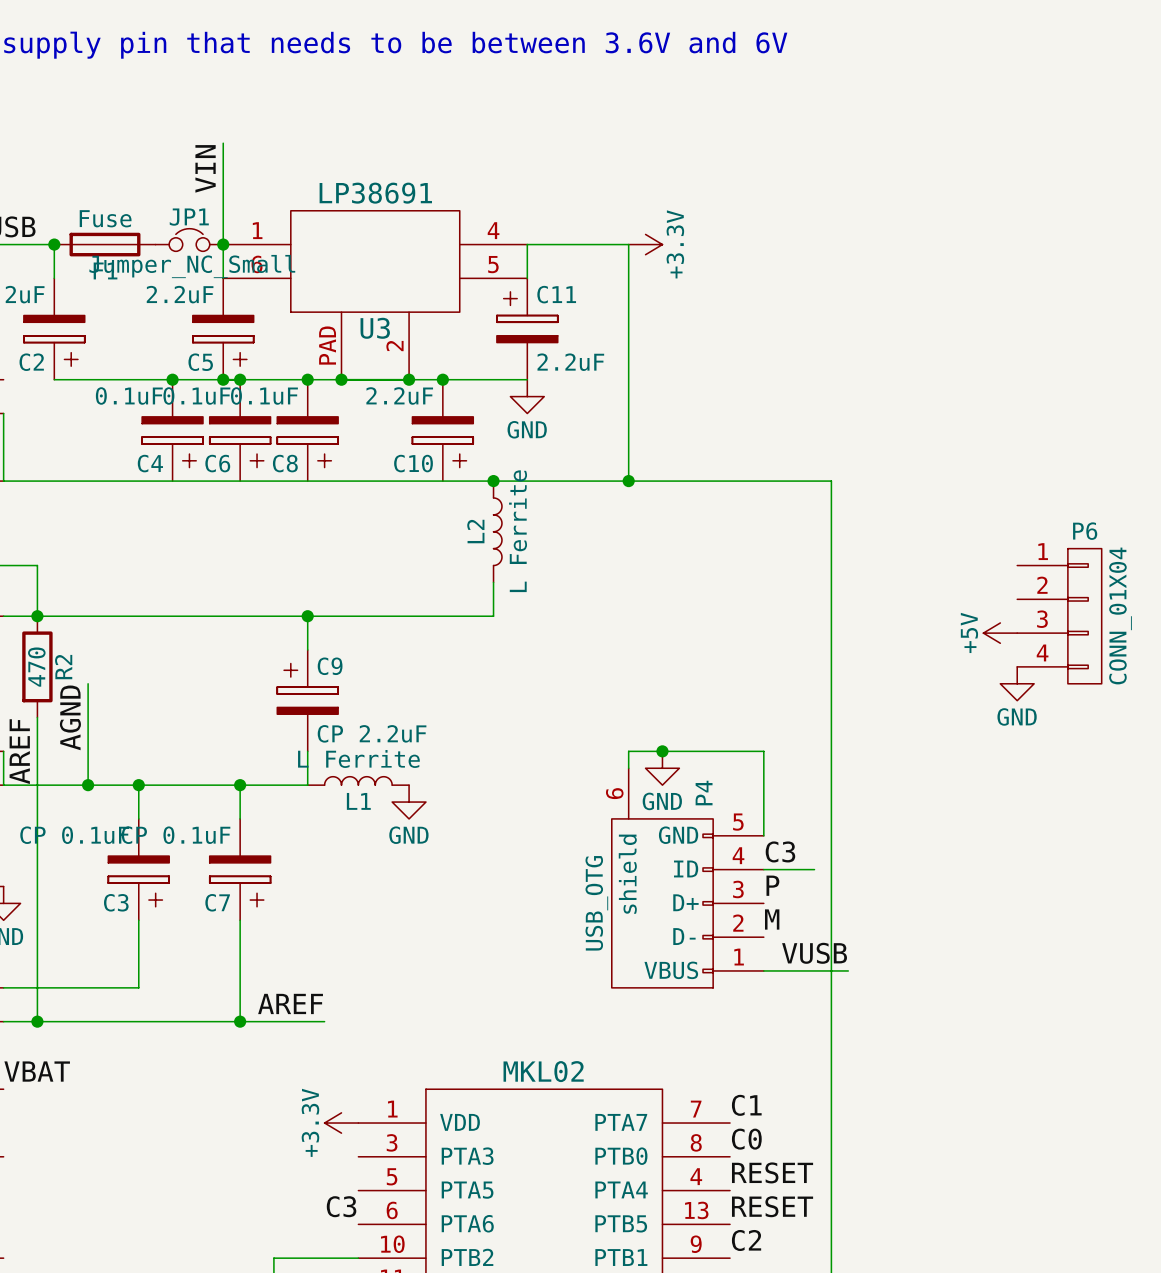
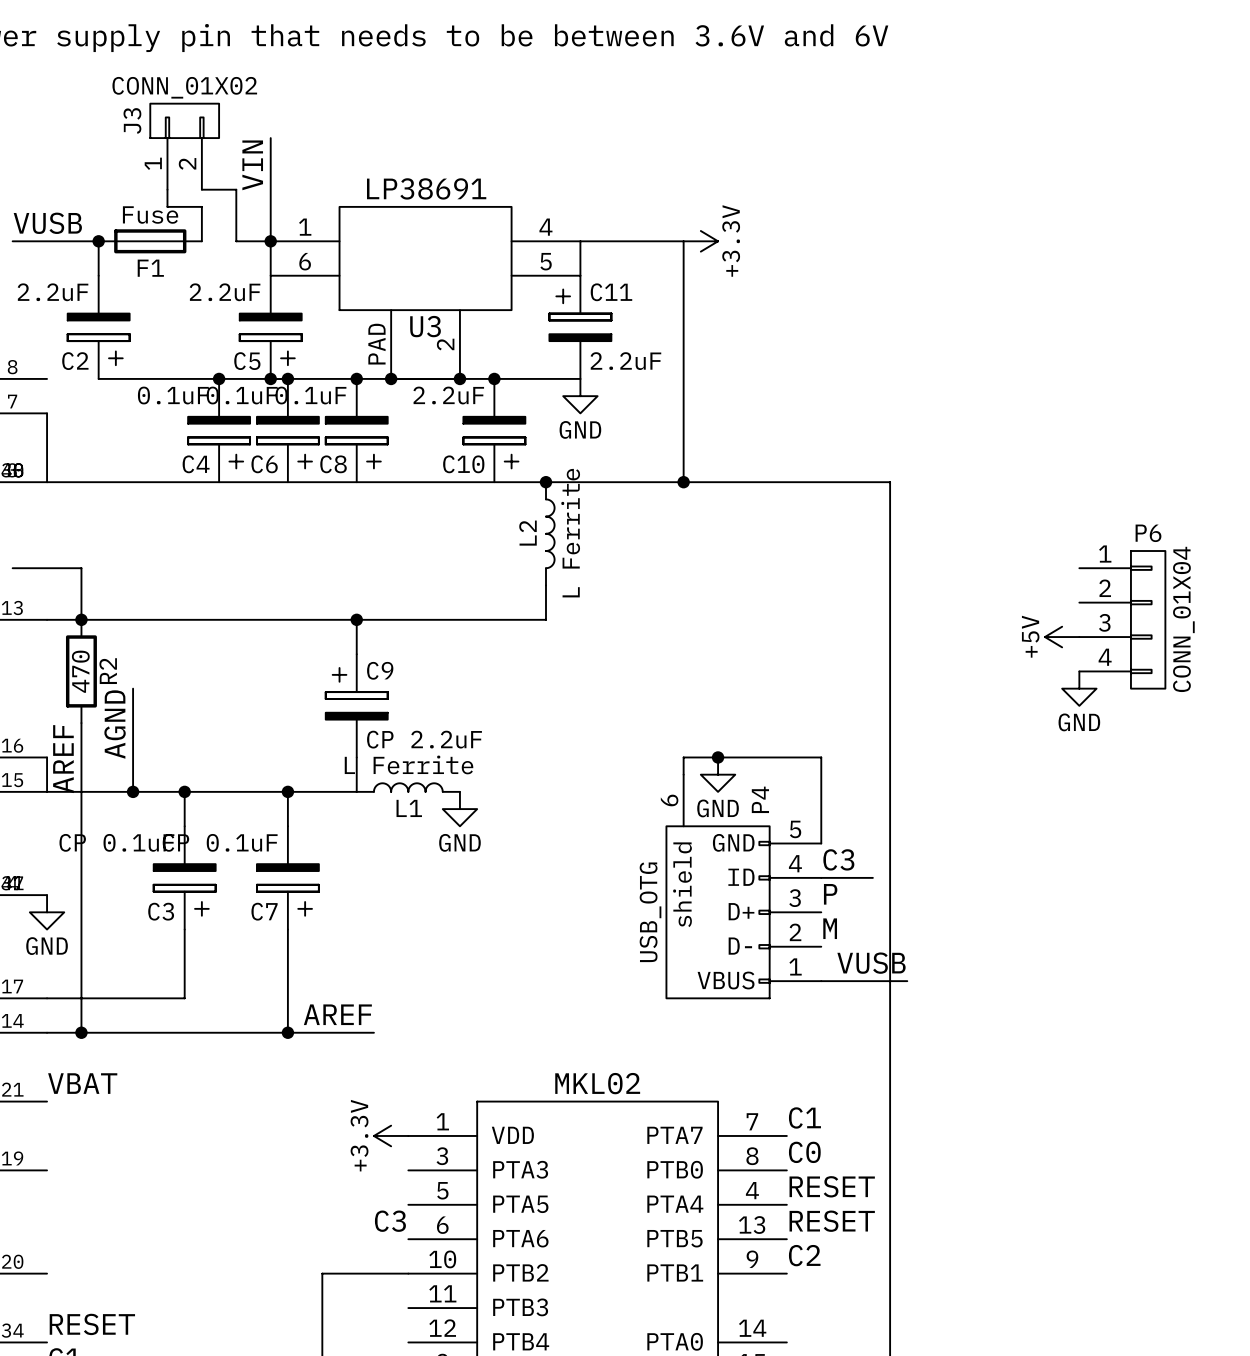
J3: none -> CONN_01X02 (184, 146)
wire: none -> (167, 189) (167, 206) (201, 206) (201, 241)
wire: none -> (201, 189) (236, 189) (236, 241) (270, 241)
JP1: Jumper_NC_Small (189, 240) -> none

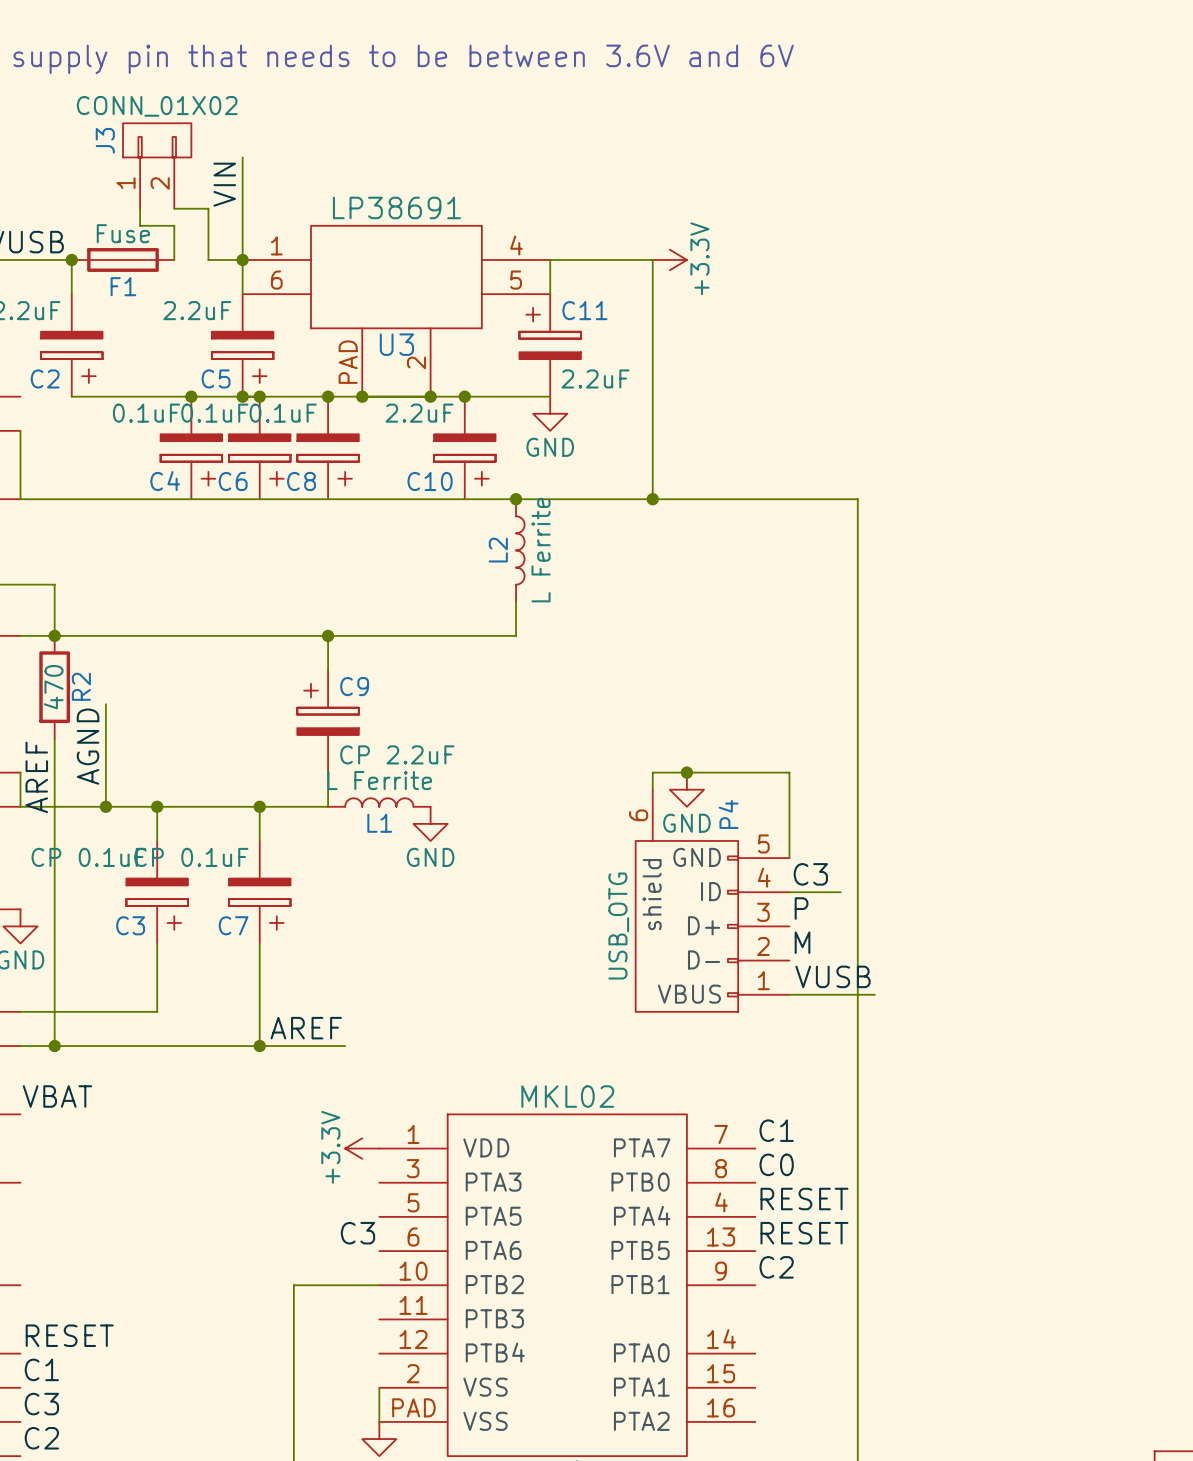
P6: CONN_01X04 (1122, 619) -> none
power symbol: +5V (1062, 637) -> none
power symbol: GND (1079, 688) -> none

